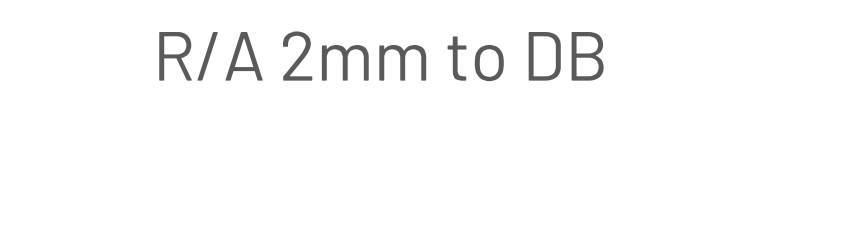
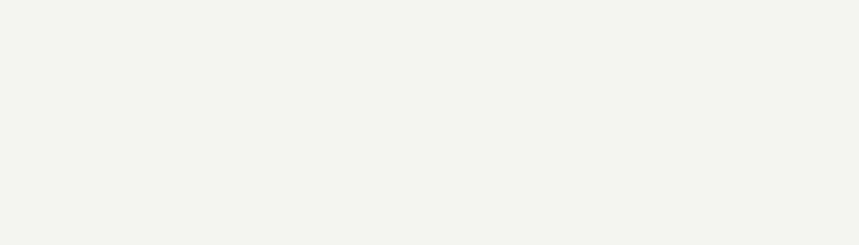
text: R/A 2mm to DB (381, 56) -> none

